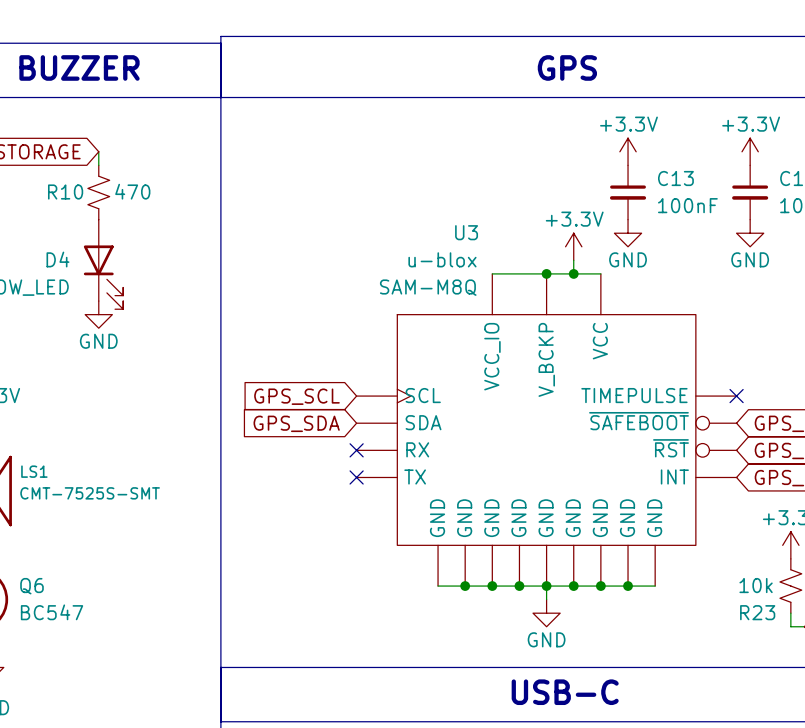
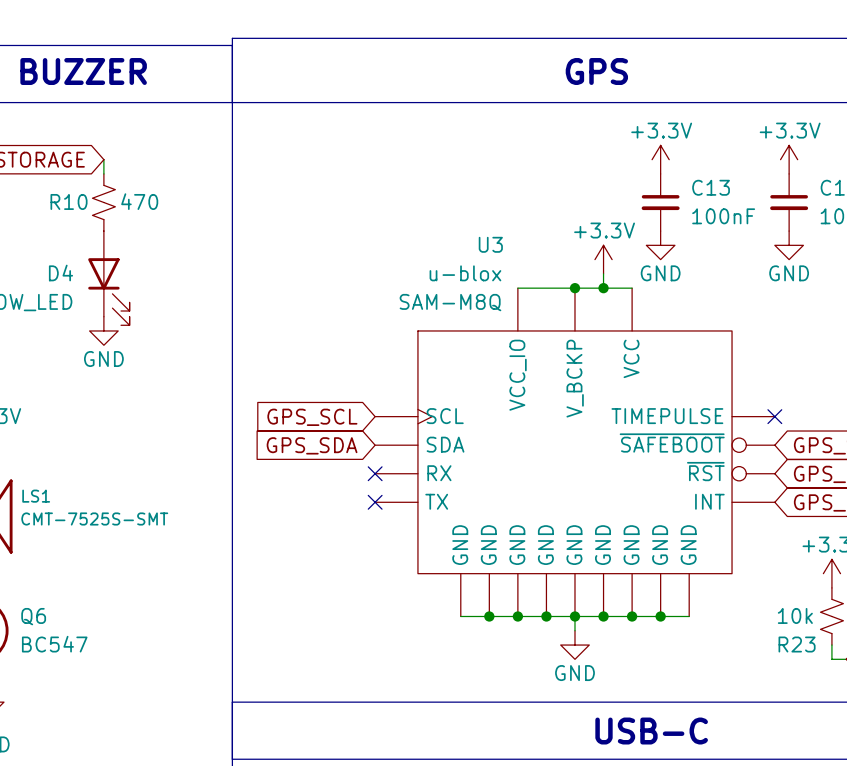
text position: USB-C (565, 692) -> USB-C (651, 731)

